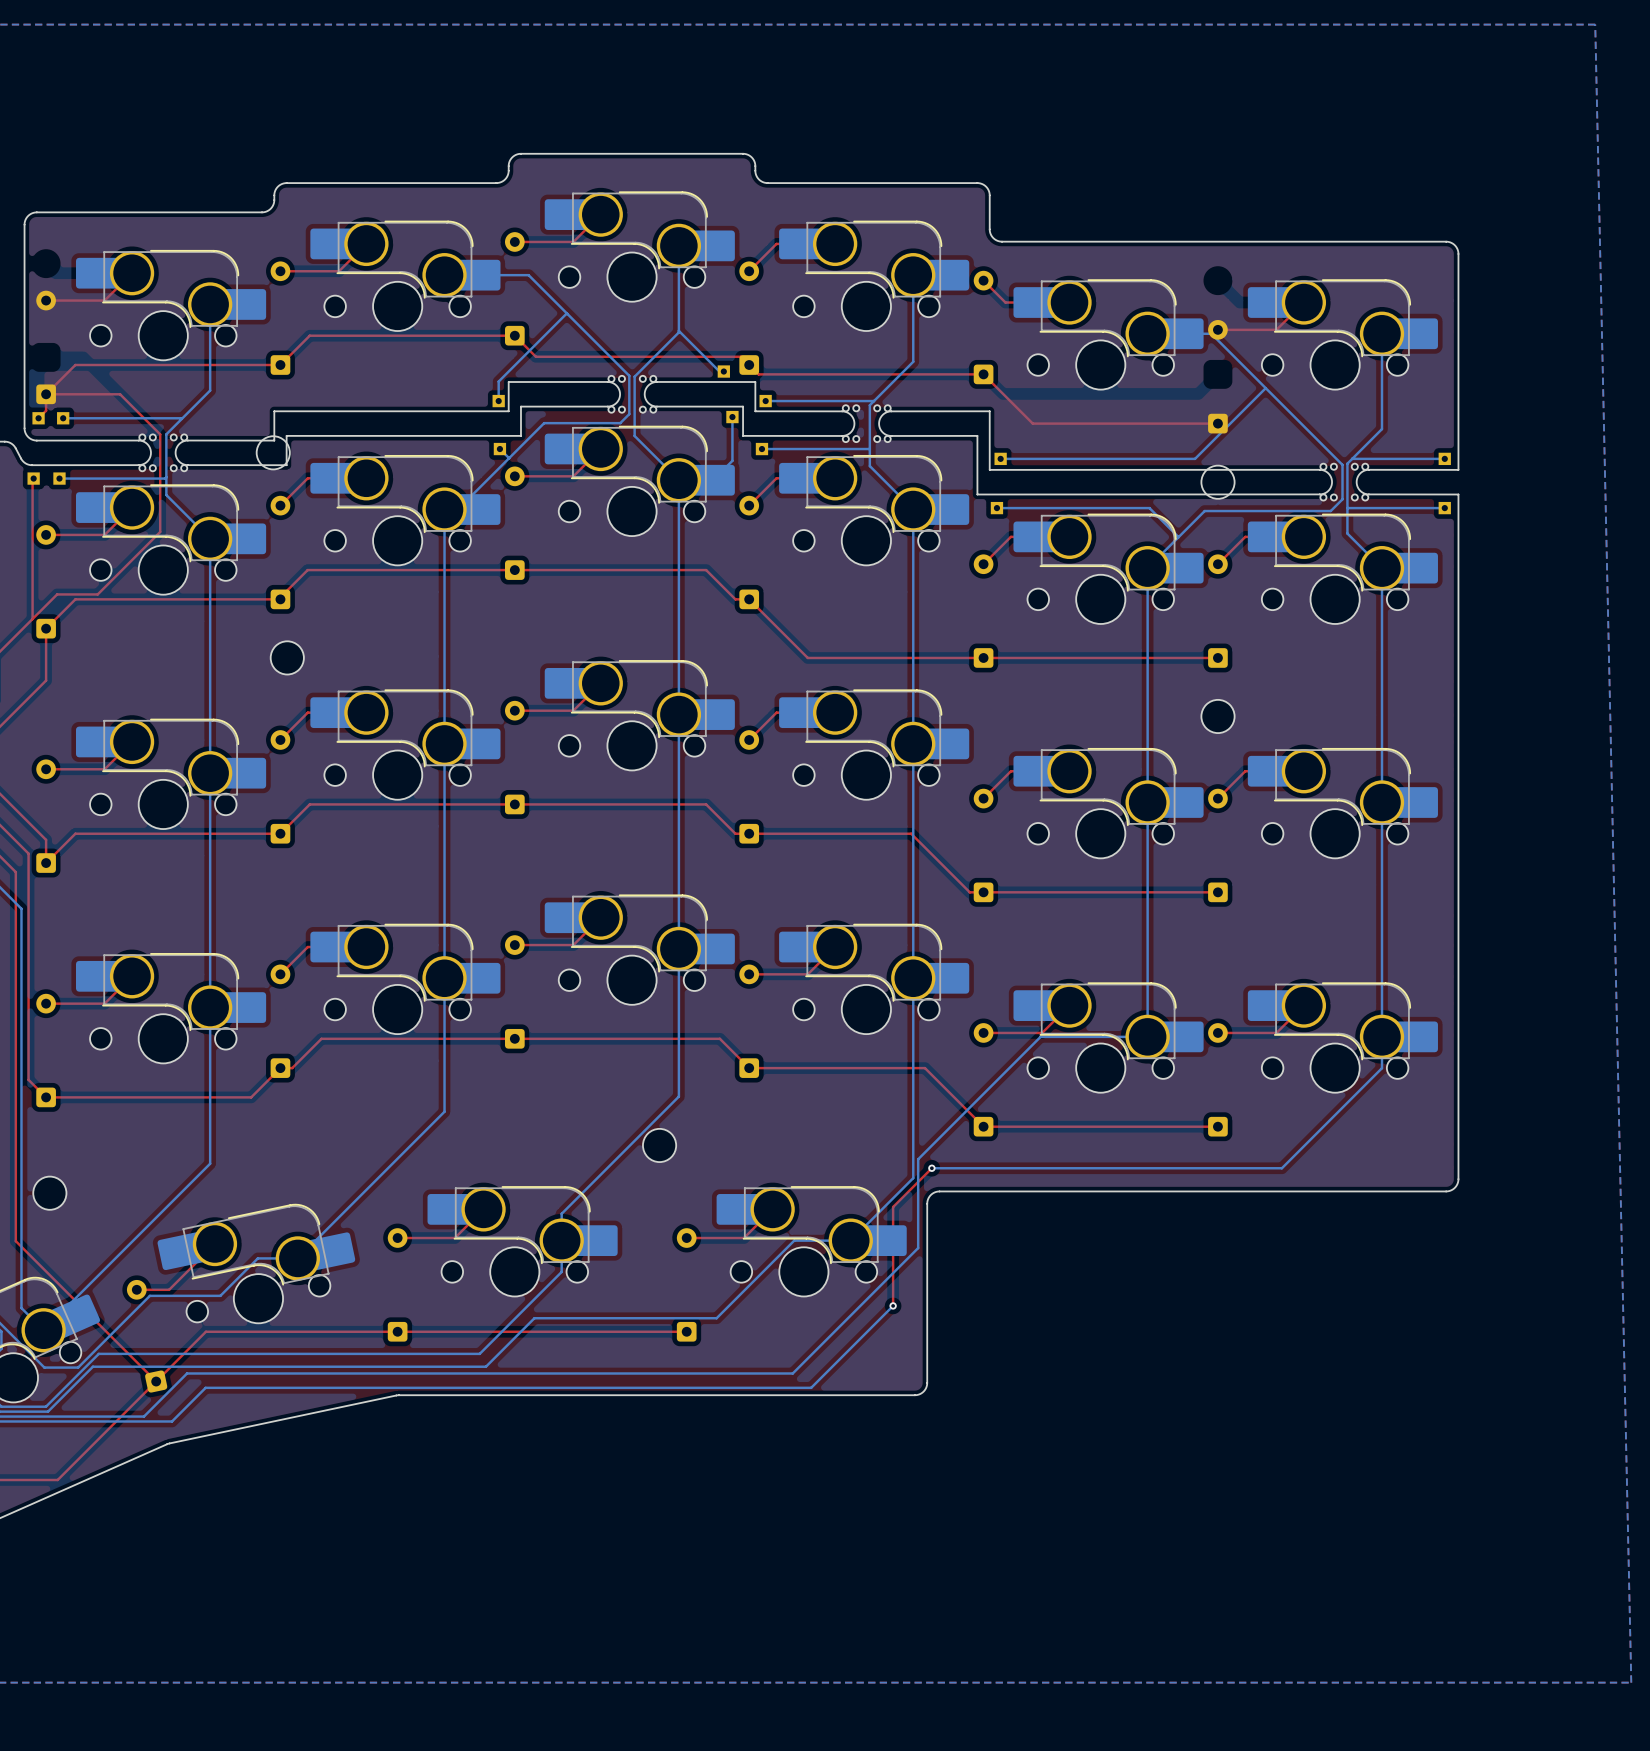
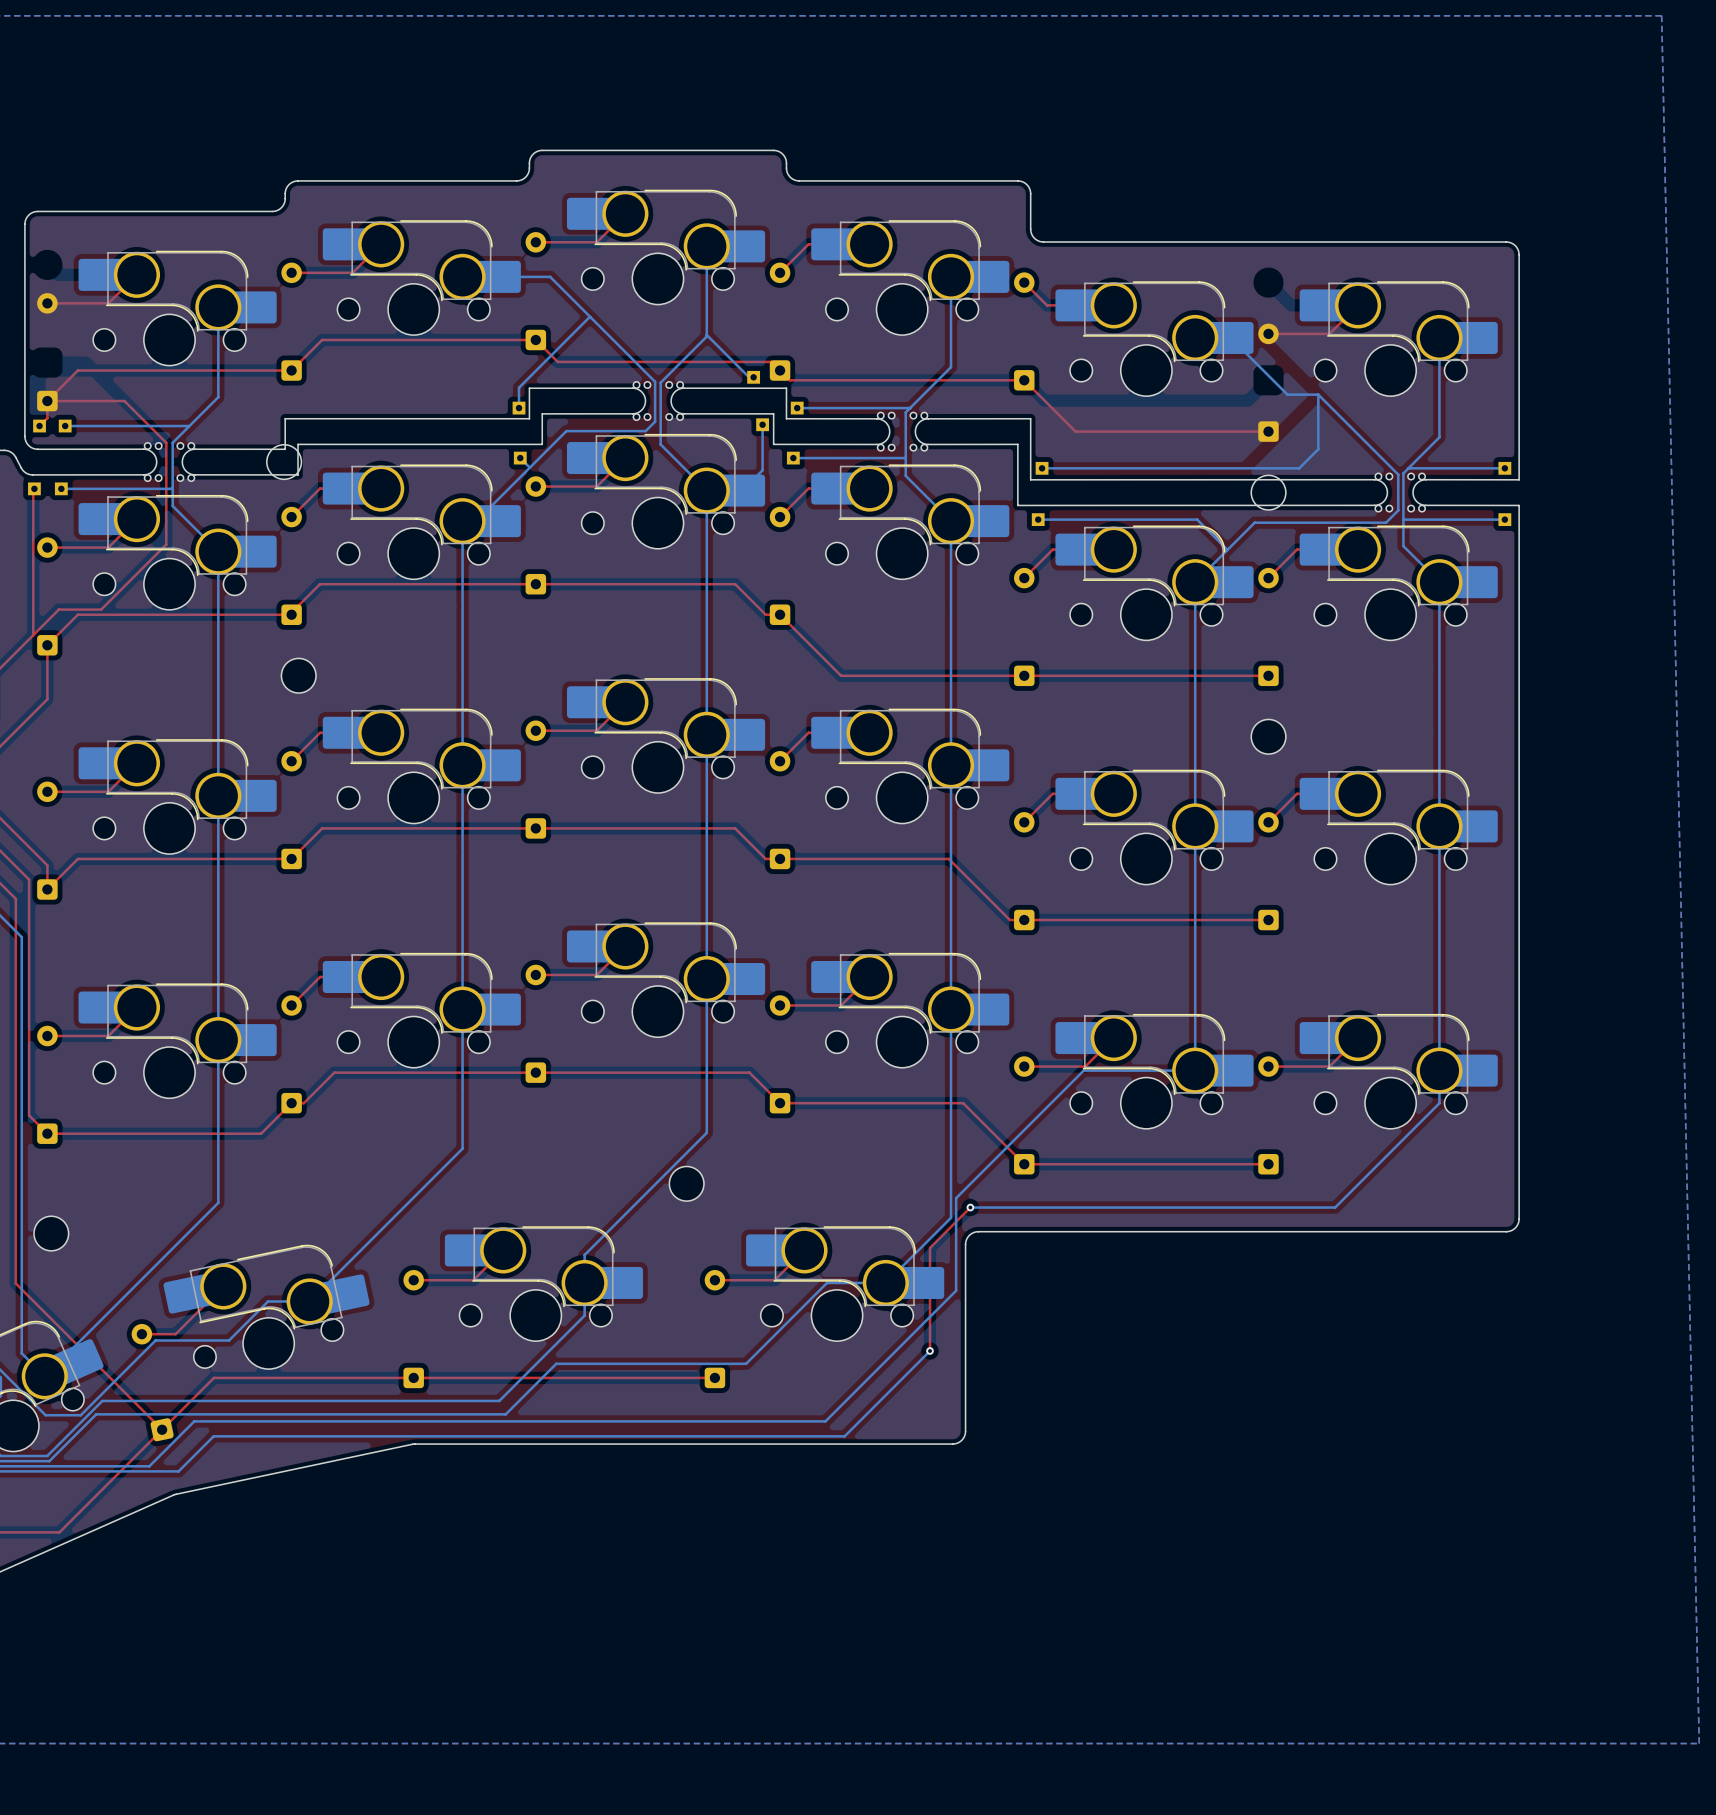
bottom track: (1181, 333) (1211, 333) (1265, 388) (1195, 458) -> (1230, 337) (1287, 394) (1318, 394) (1318, 449) (1299, 468) (1244, 468)

